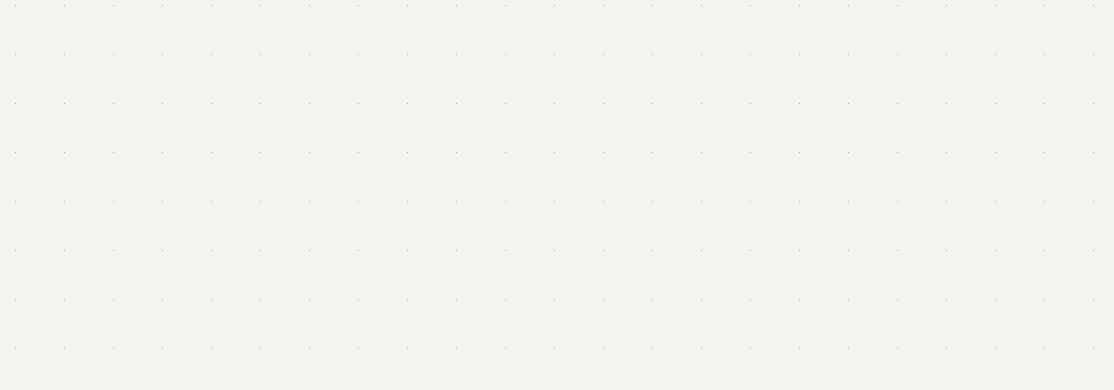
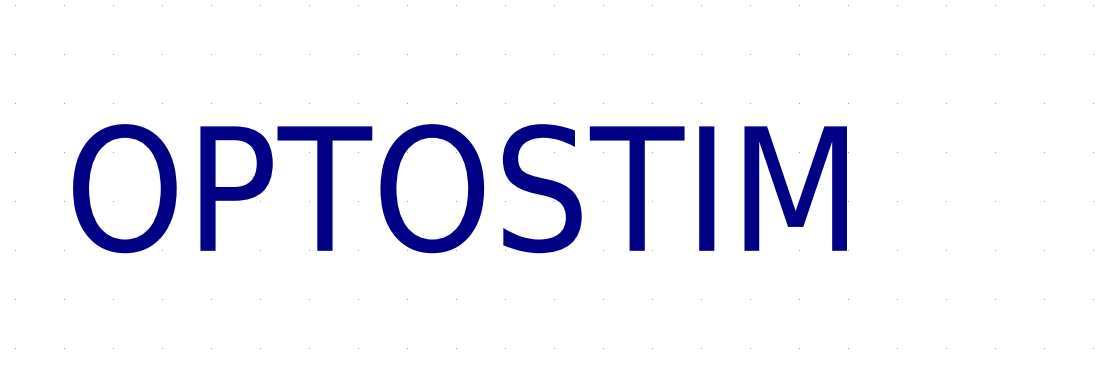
text: none -> OPTOSTIM (460, 188)

